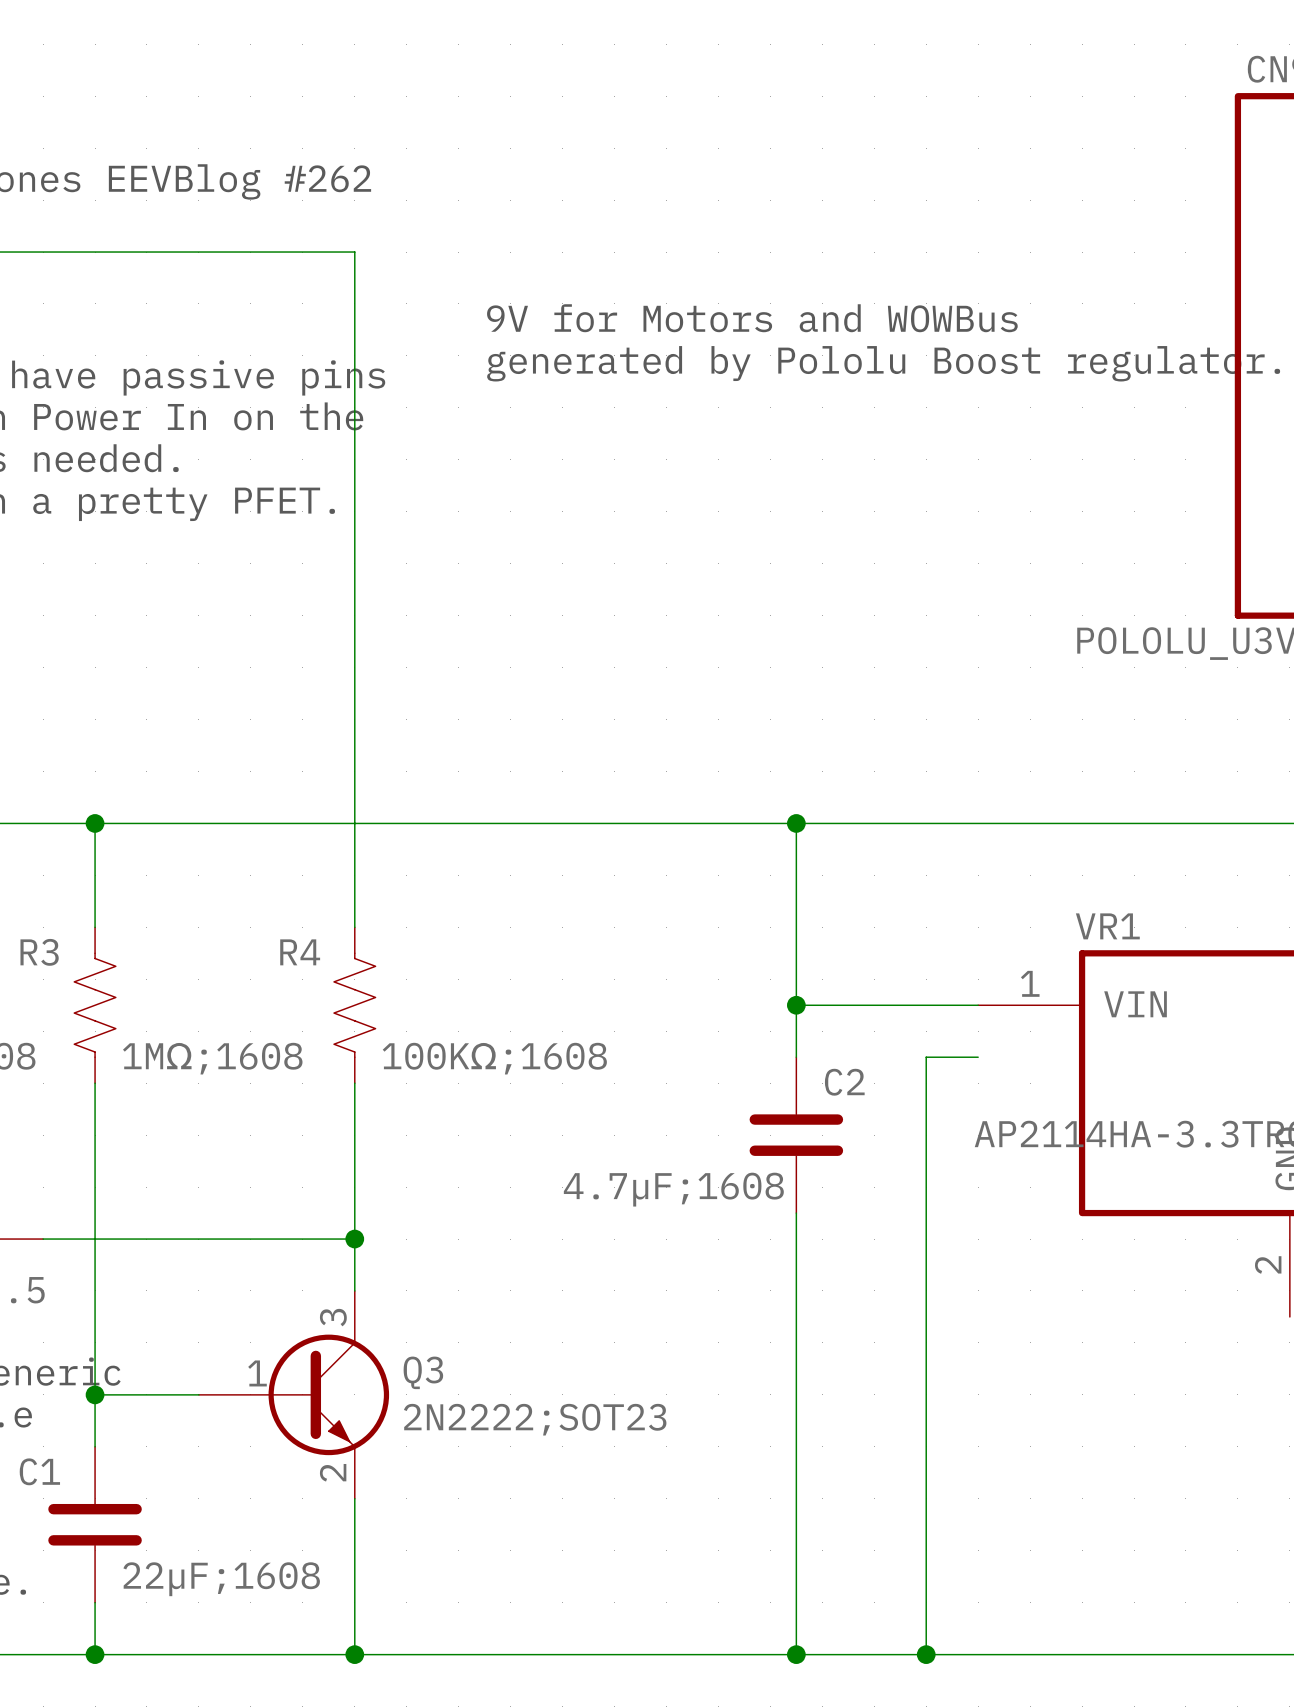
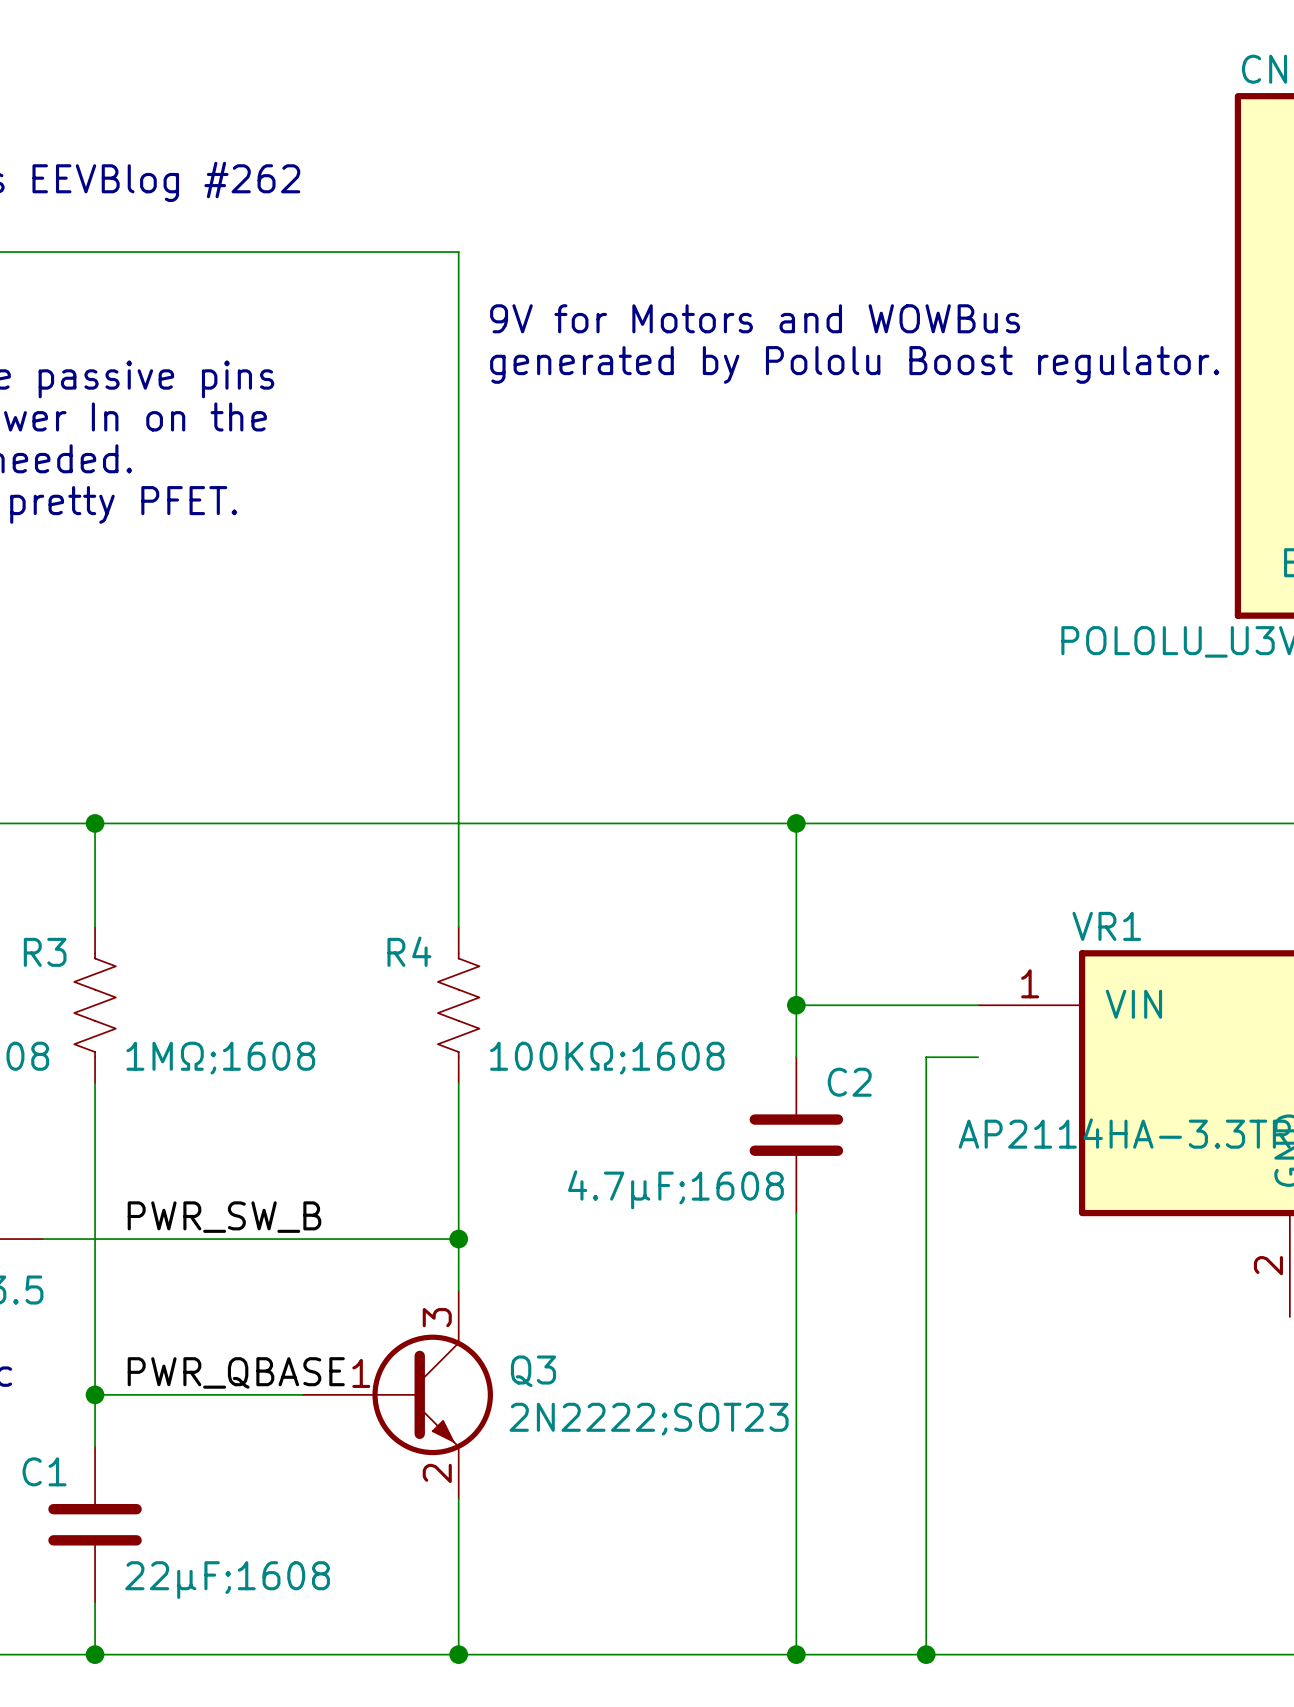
wire: (354, 252) (354, 927) -> (354, 252) (458, 252) (458, 927)
R4 position: (354, 1005) -> (458, 1005)
wire: (354, 1083) (354, 1290) -> (458, 1083) (458, 1290)
label: none -> PWR_SW_B (224, 1217)
wire: none -> (354, 1239) (458, 1239)
junction position: (354, 1239) -> (458, 1239)
label: none -> PWR_QBASE (236, 1372)
Q3 position: (294, 1394) -> (397, 1394)
wire: (354, 1498) (354, 1654) -> (458, 1498) (458, 1654)
junction position: (354, 1654) -> (458, 1654)

